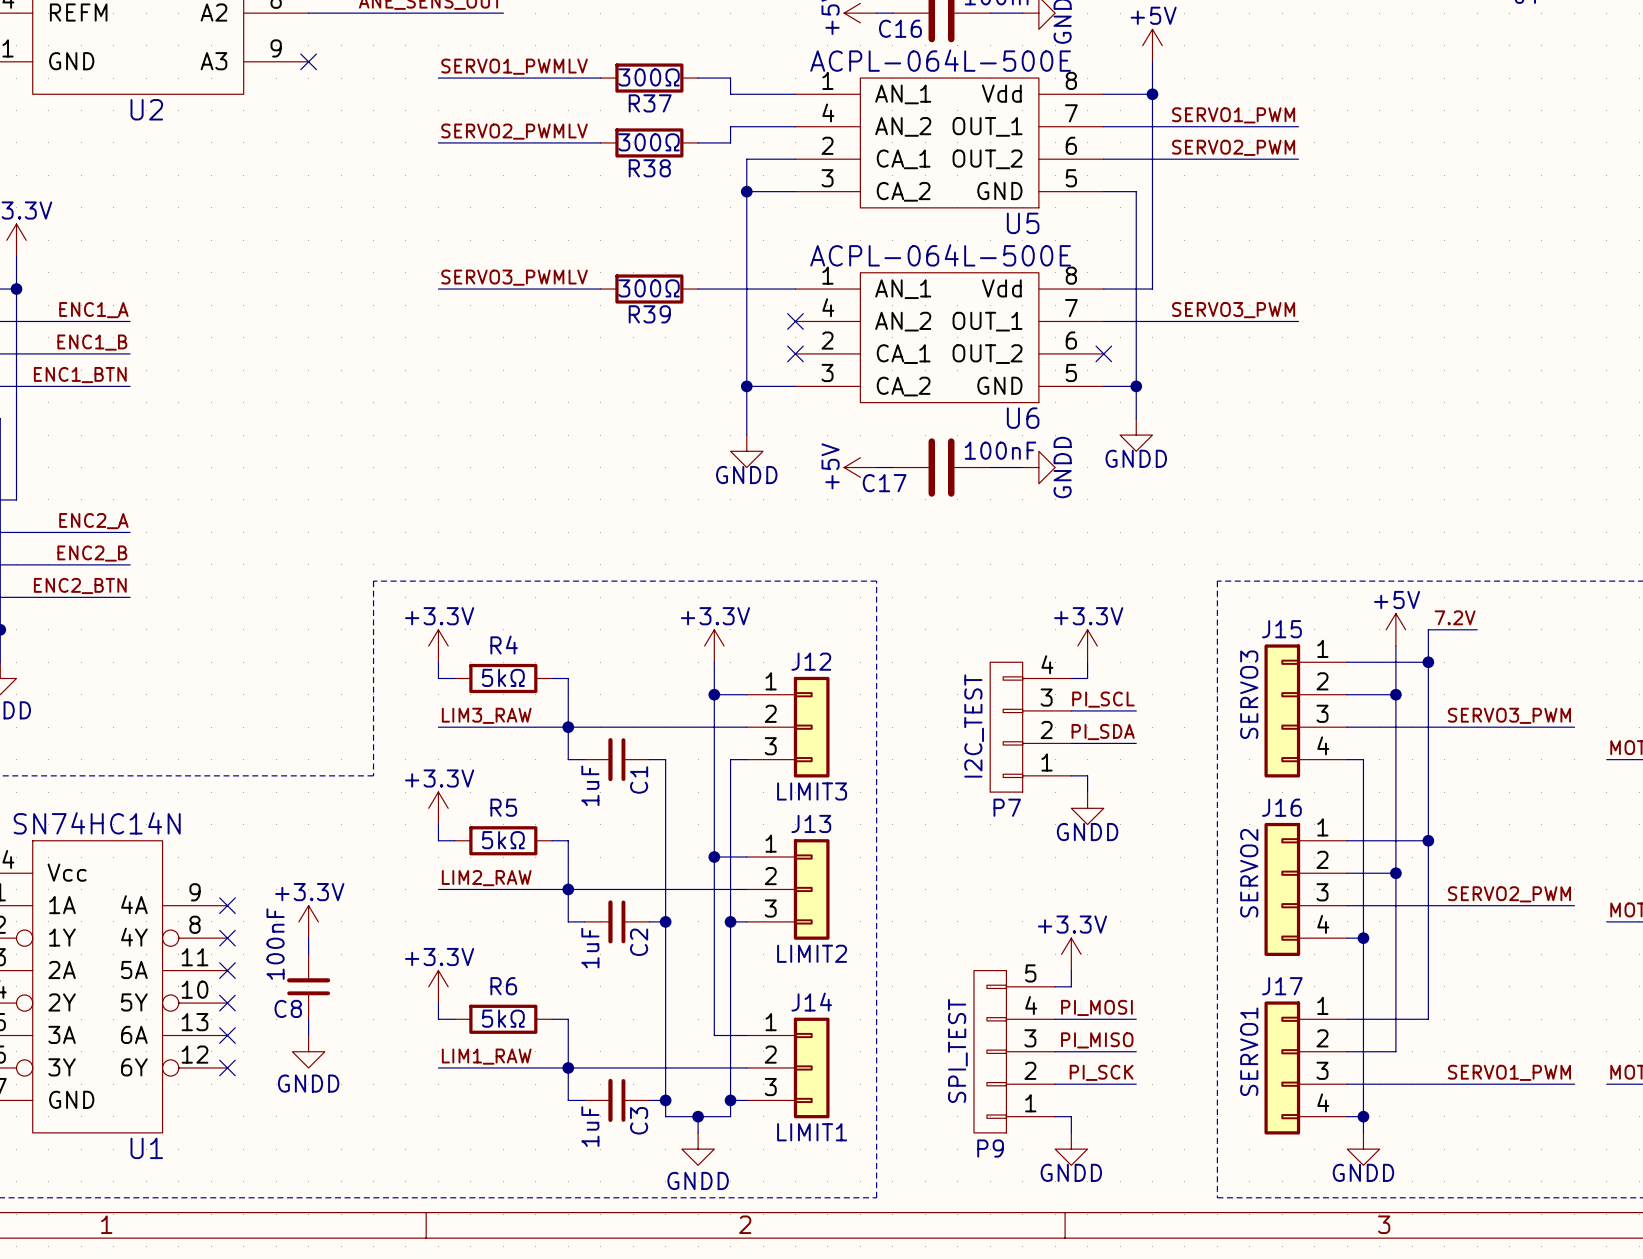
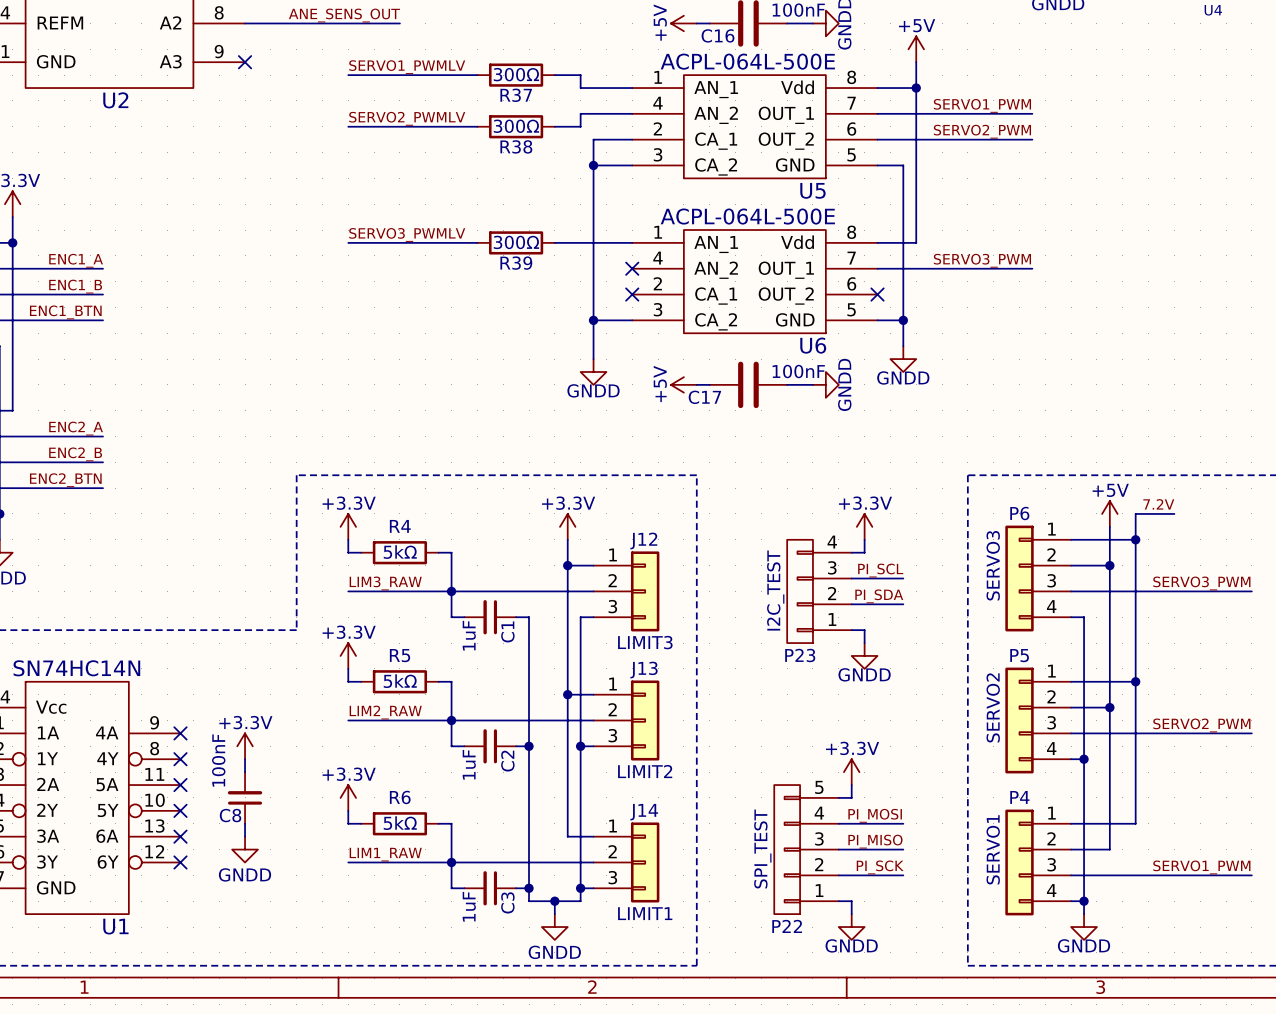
J15 name: J15 (1281, 629) -> P6 (1019, 513)
P7 name: P7 (1007, 807) -> P23 (800, 655)
J16 name: J16 (1281, 807) -> P5 (1019, 655)
J17 name: J17 (1282, 986) -> P4 (1019, 797)
P9 name: P9 (990, 1148) -> P22 (787, 926)

